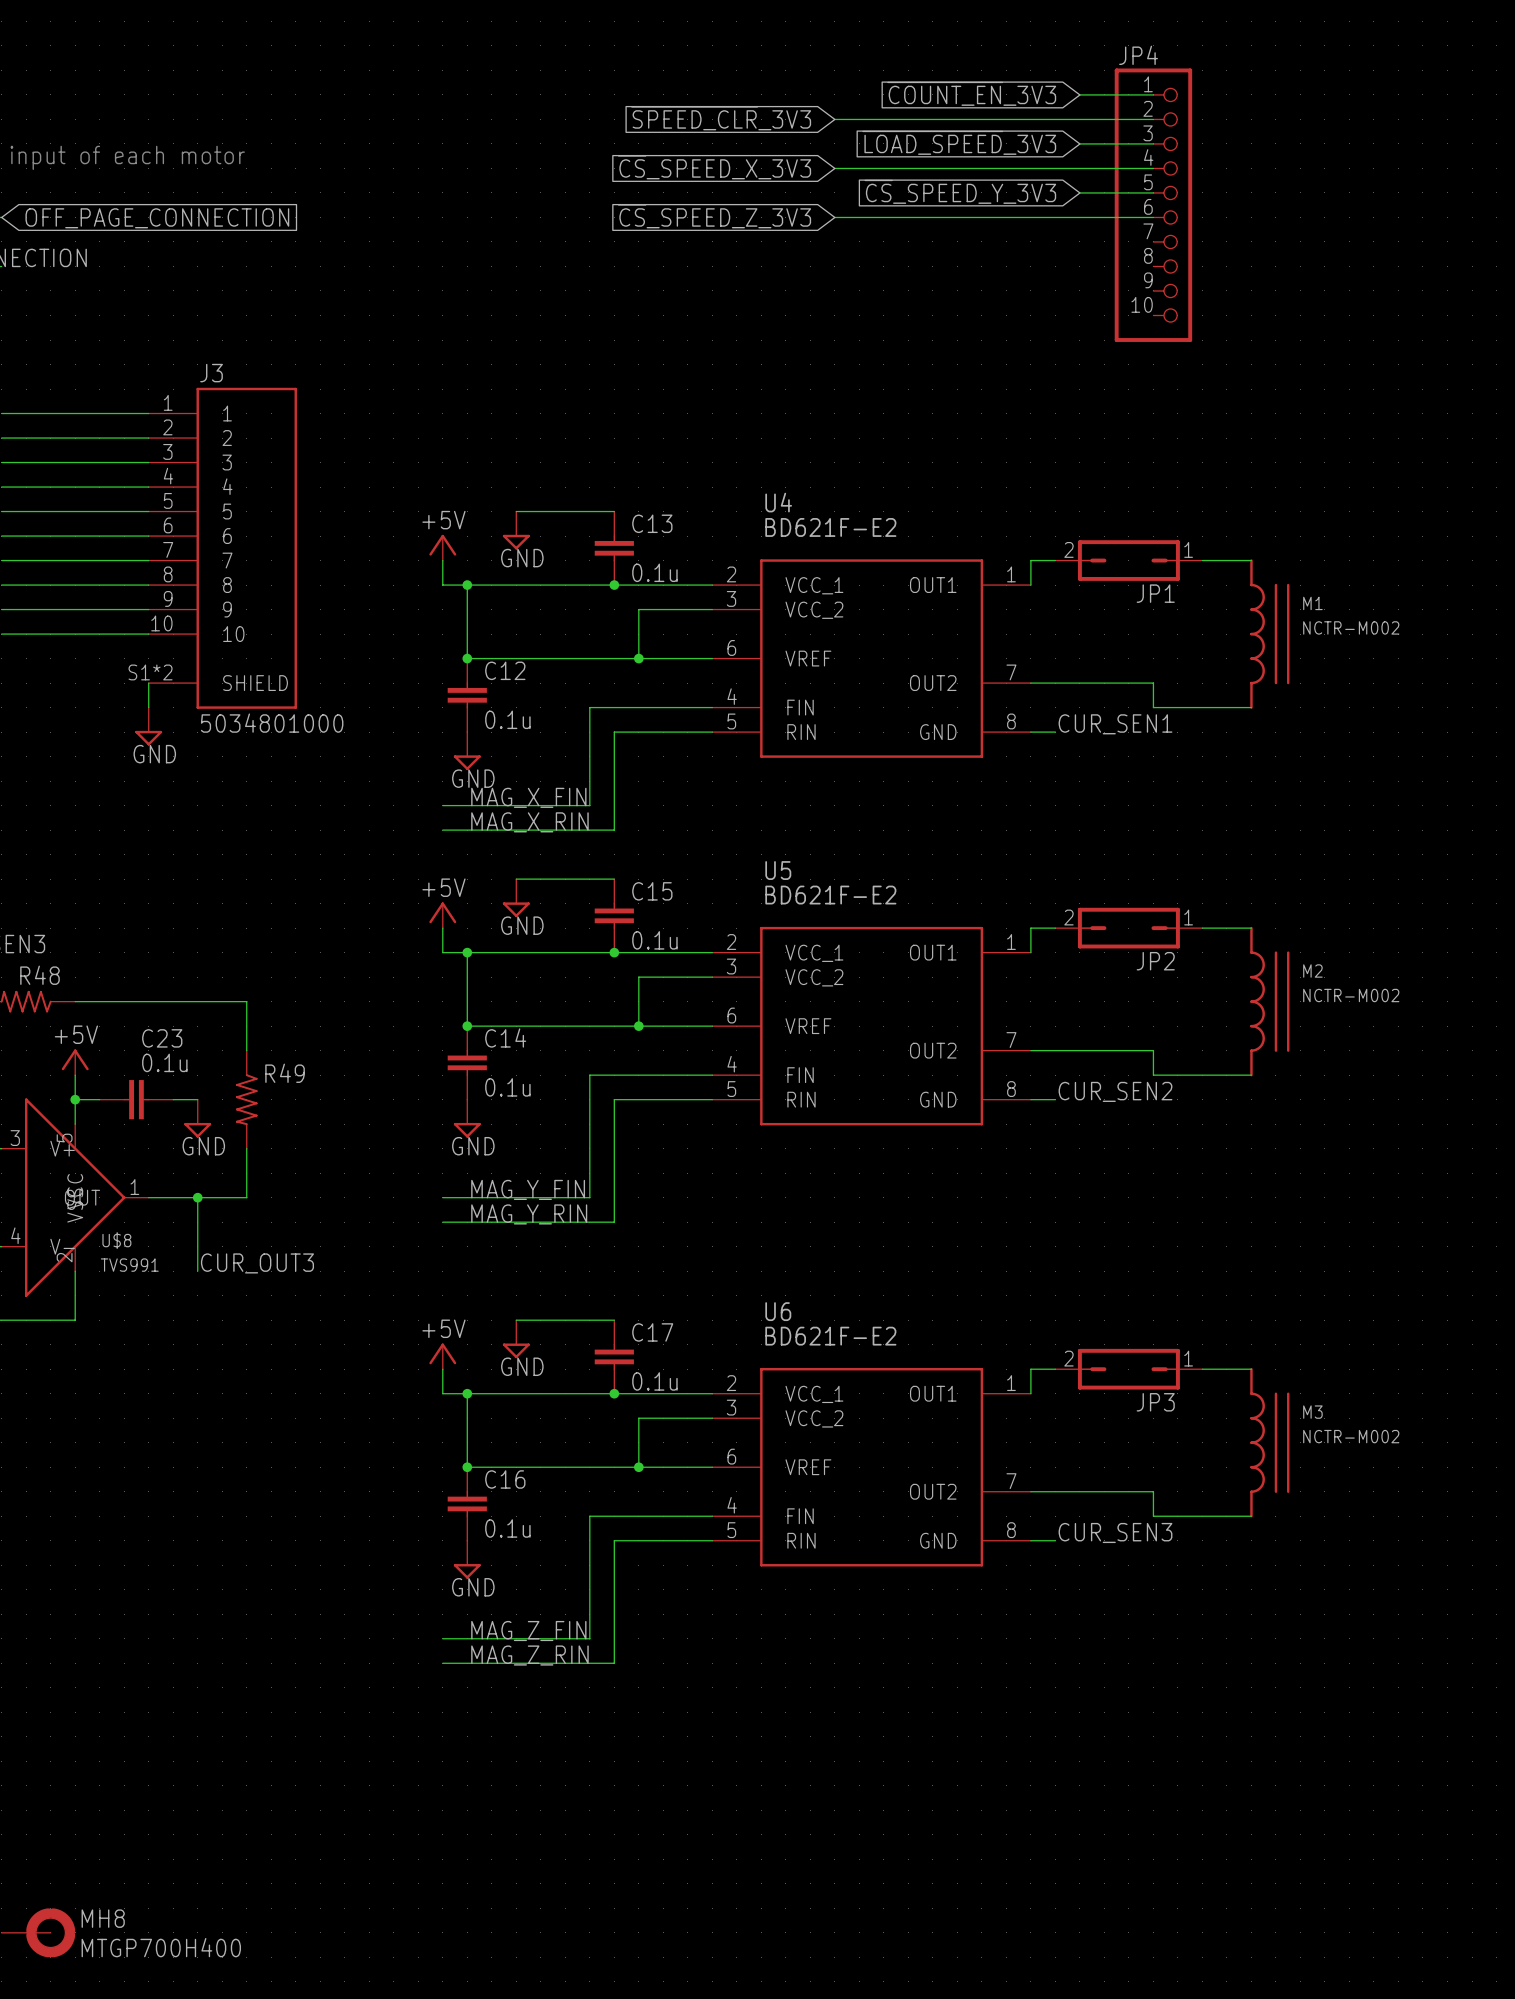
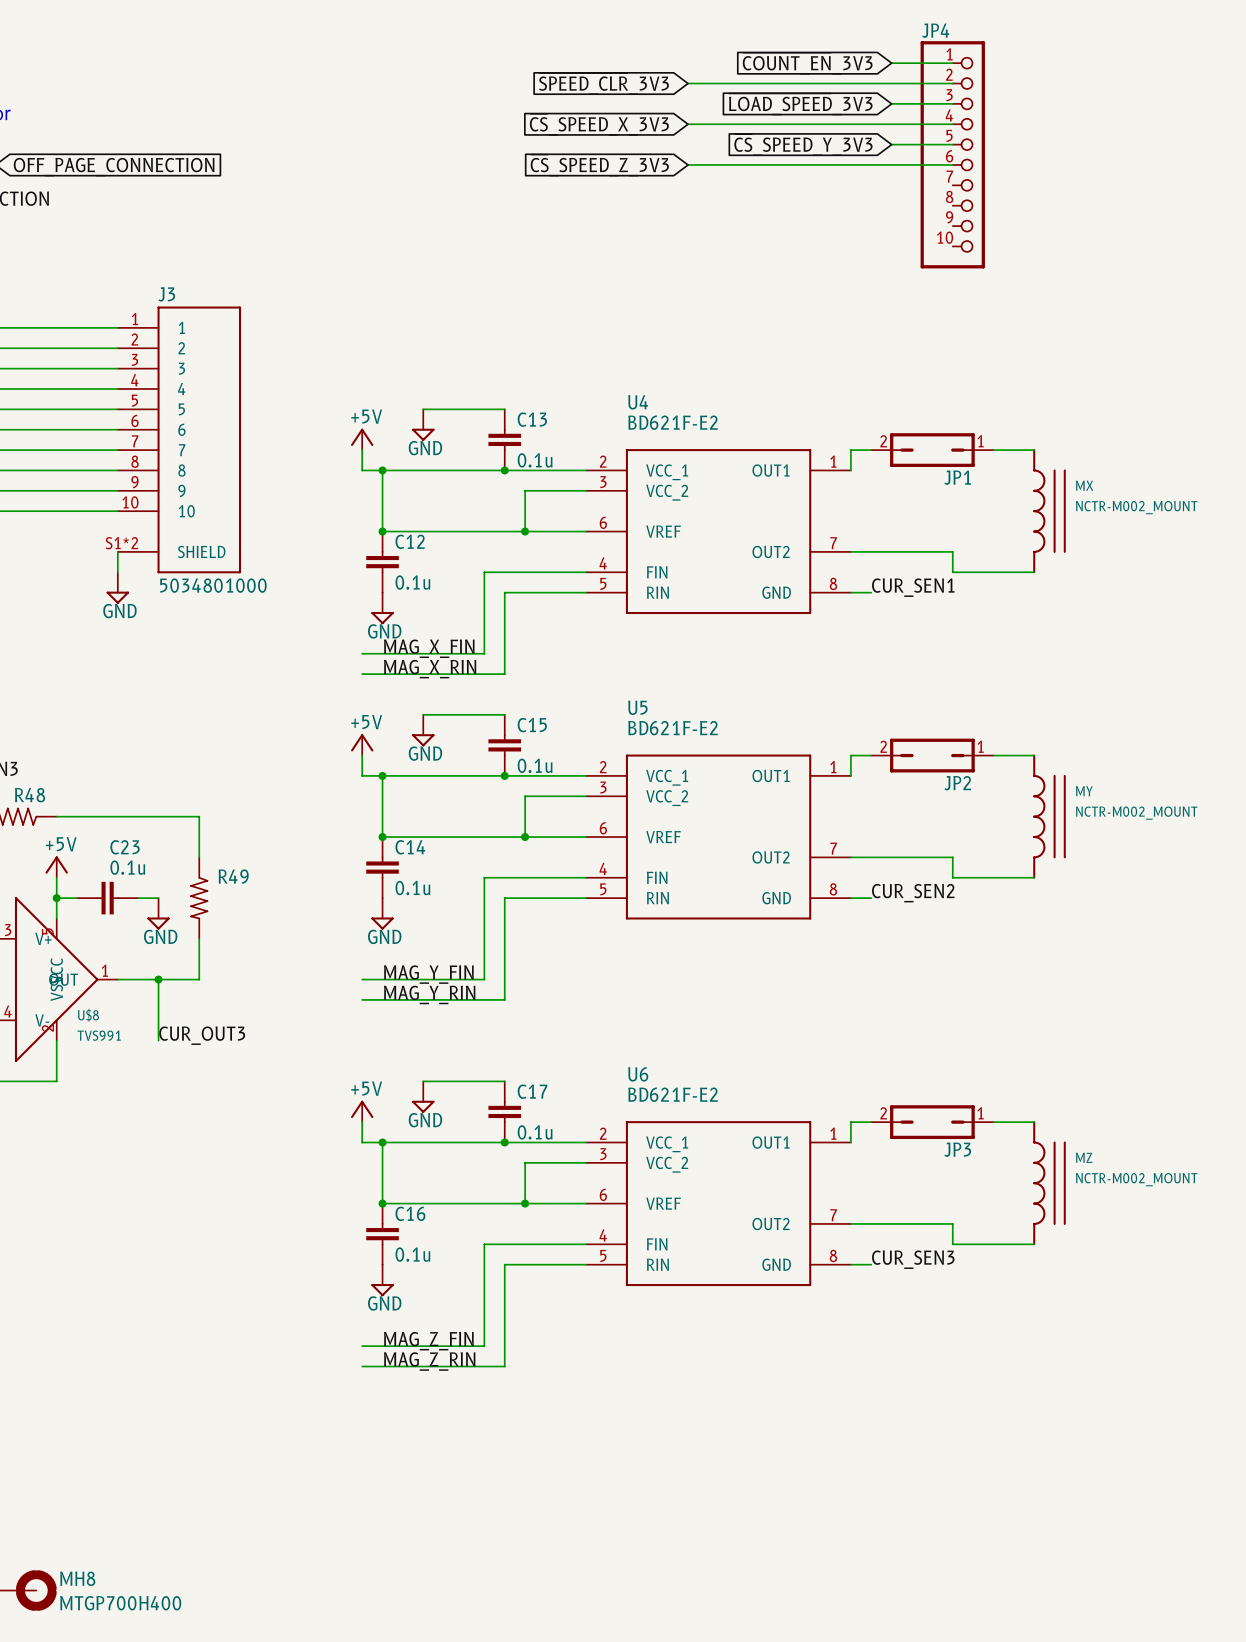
M1 name: M1 (1312, 603) -> MX (1084, 485)
M1 value: NCTR-M002 (1351, 627) -> NCTR-M002_MOUNT (1136, 507)
M2 name: M2 (1312, 971) -> MY (1084, 791)
M2 value: NCTR-M002 (1351, 995) -> NCTR-M002_MOUNT (1136, 813)
M3 name: M3 (1312, 1412) -> MZ (1084, 1157)
M3 value: NCTR-M002 (1351, 1436) -> NCTR-M002_MOUNT (1136, 1179)

